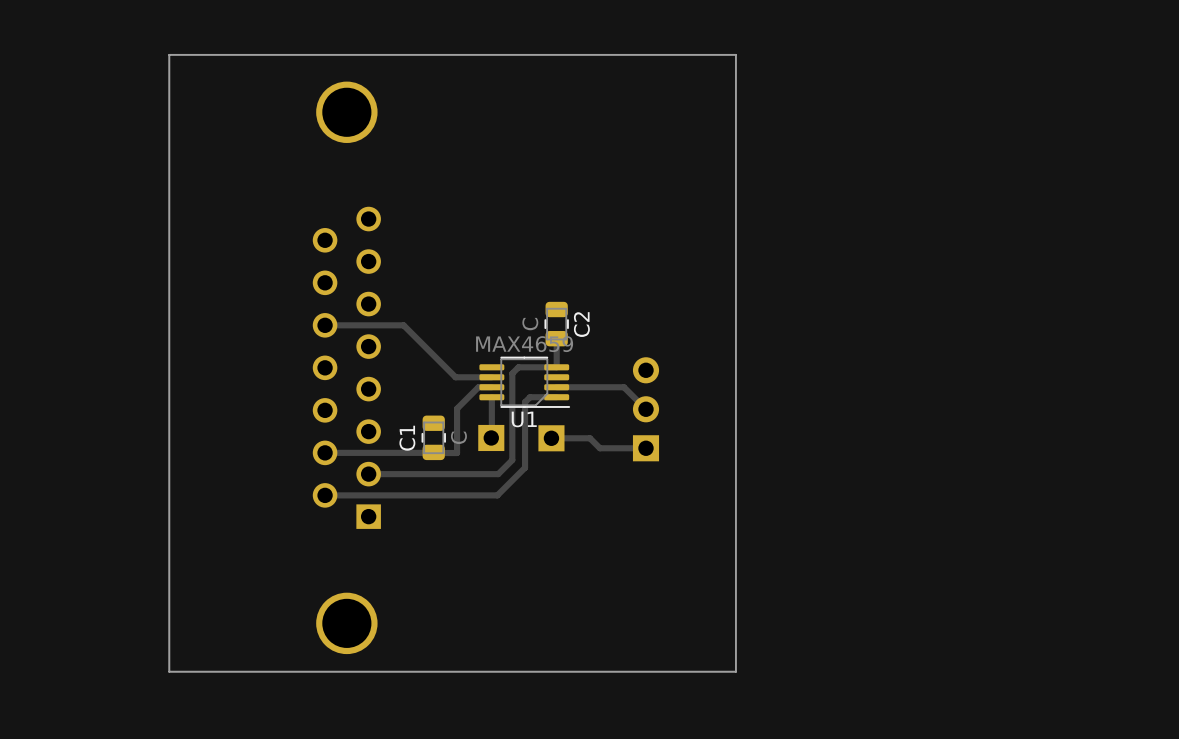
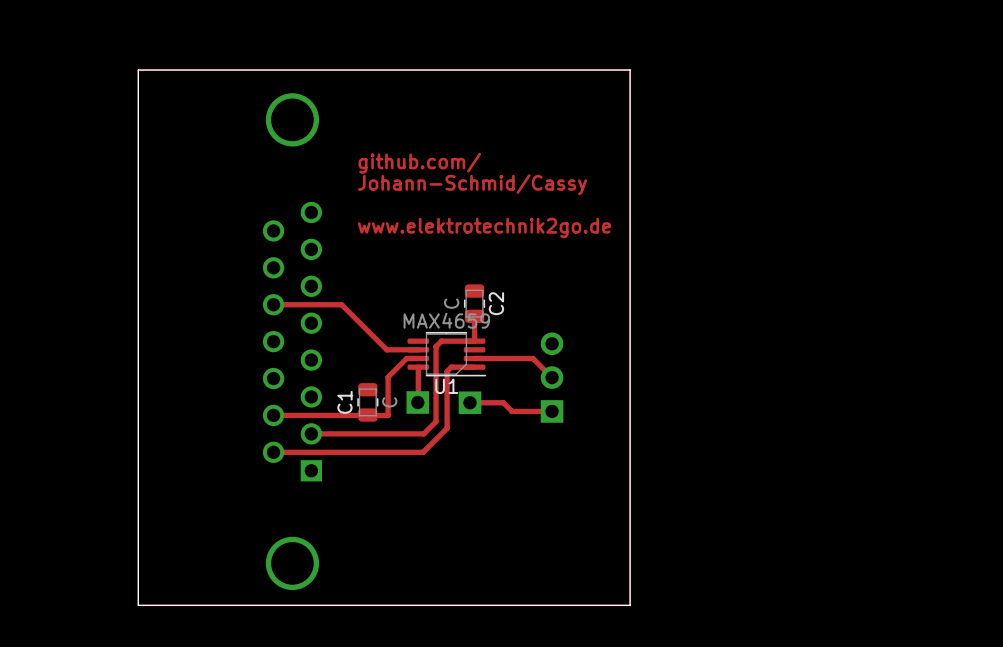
text: none -> github.com/ (419, 163)
text: none -> Johann-Schmid/Cassy (472, 184)
text: none -> www.elektrotechnik2go.de (484, 227)

